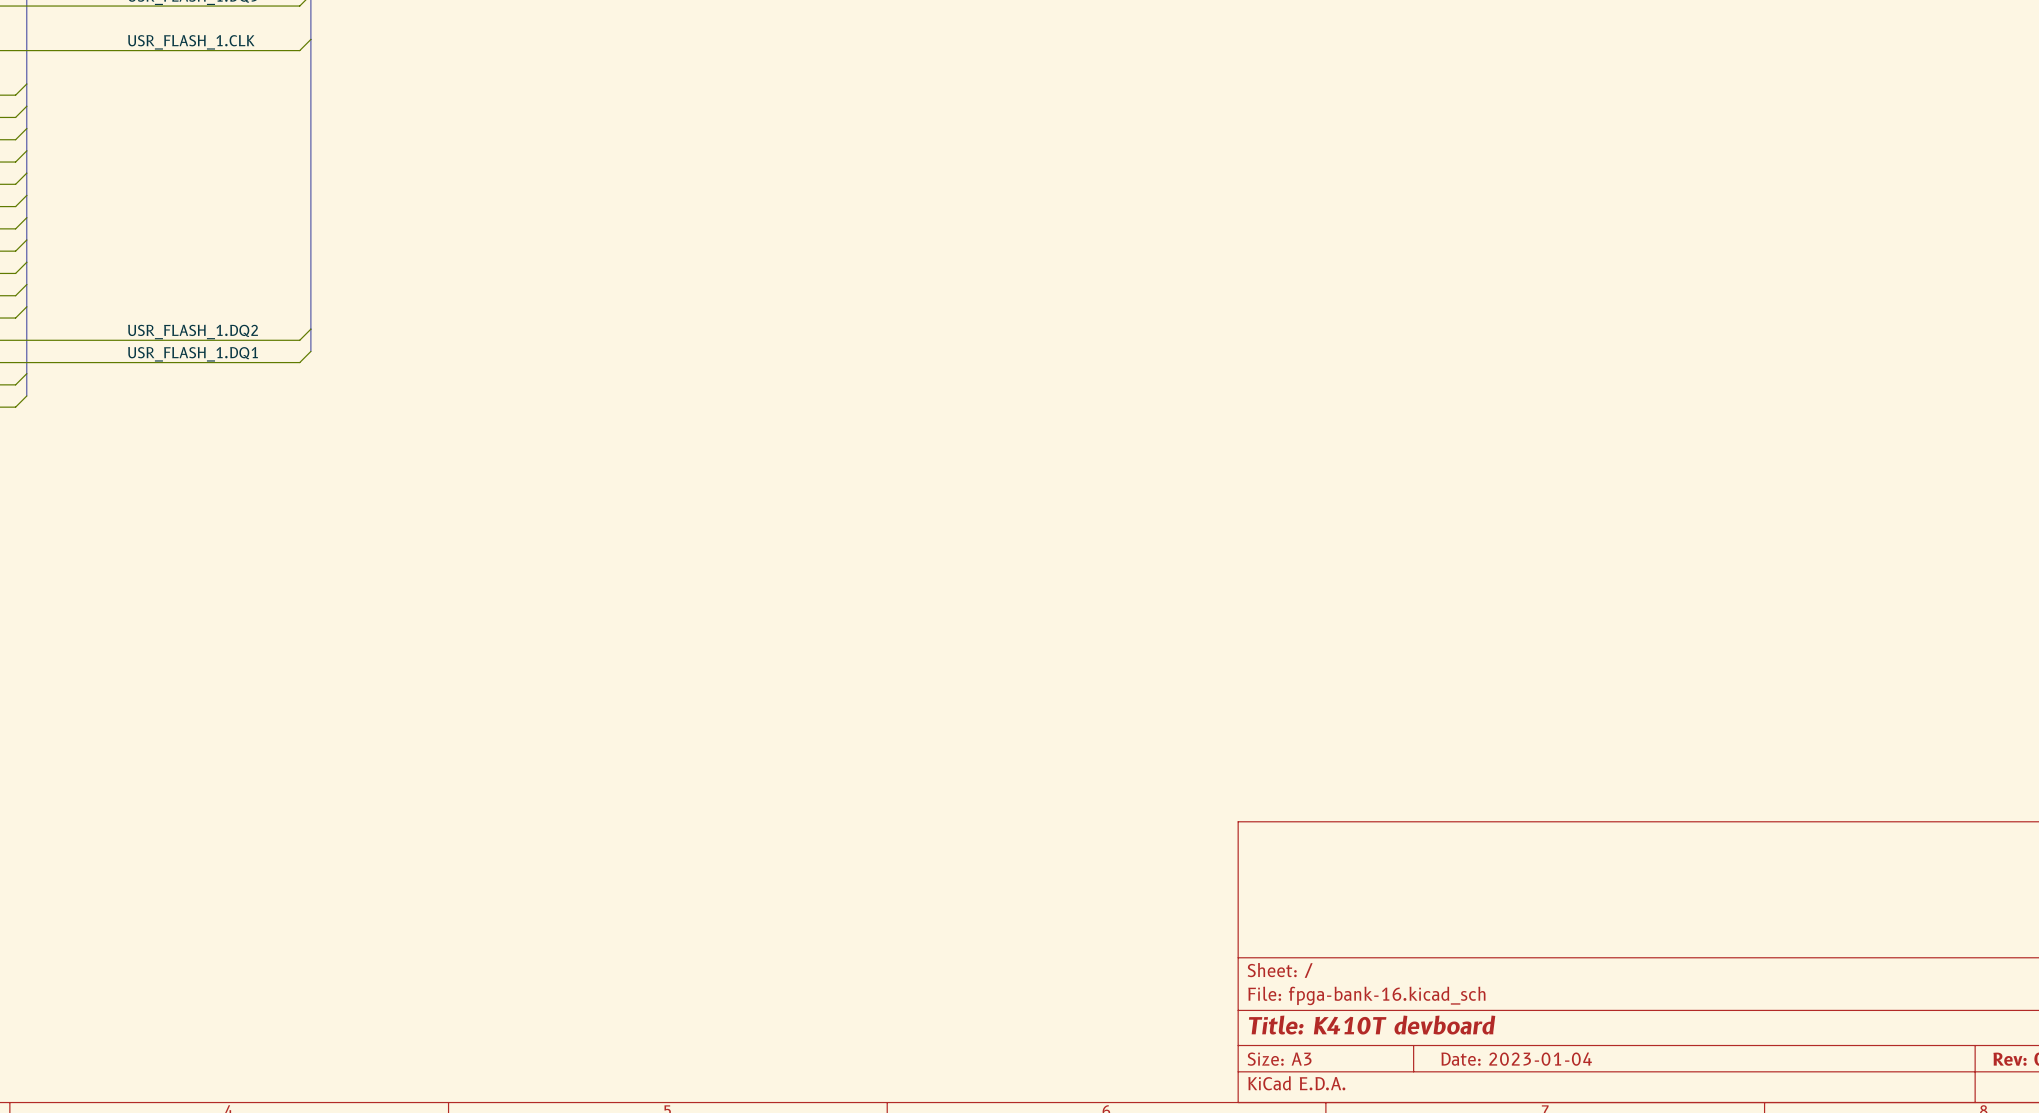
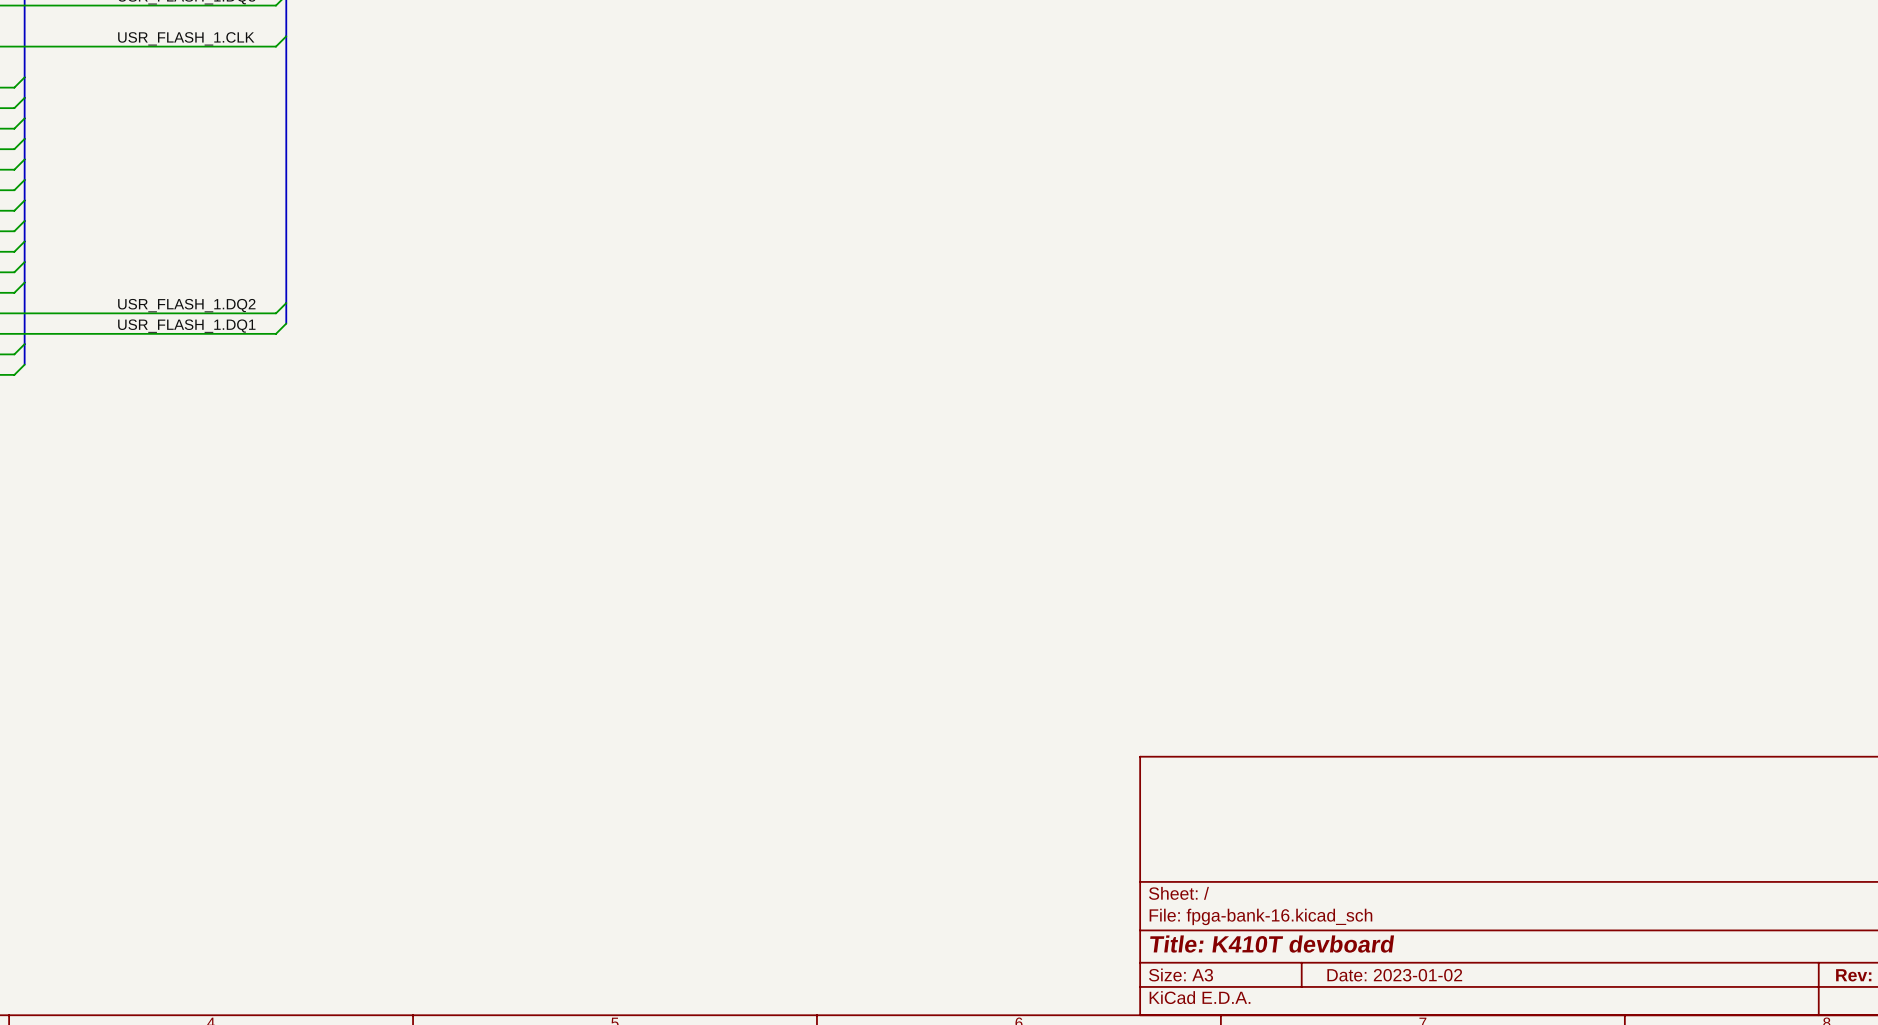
title block: Date: 2023-01-04 (1516, 1059) -> Date: 2023-01-02 (1394, 975)

